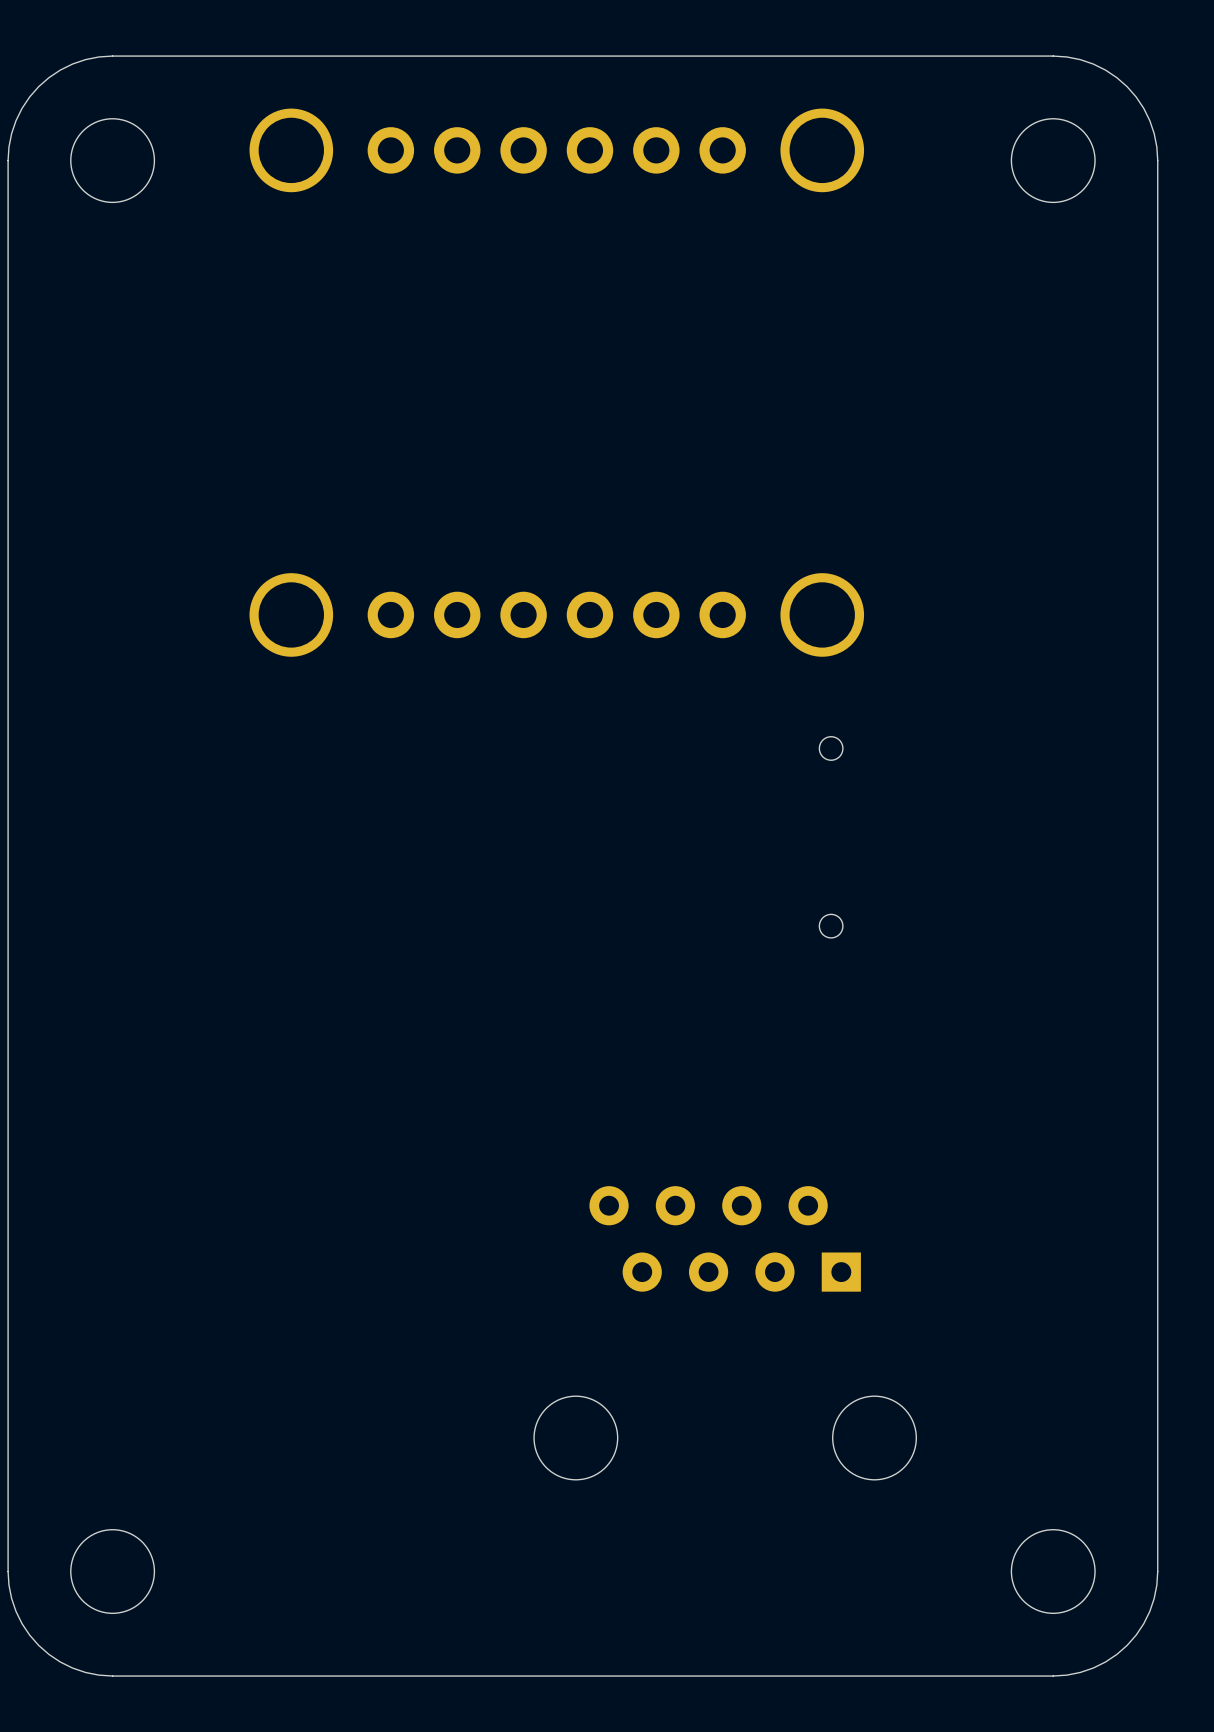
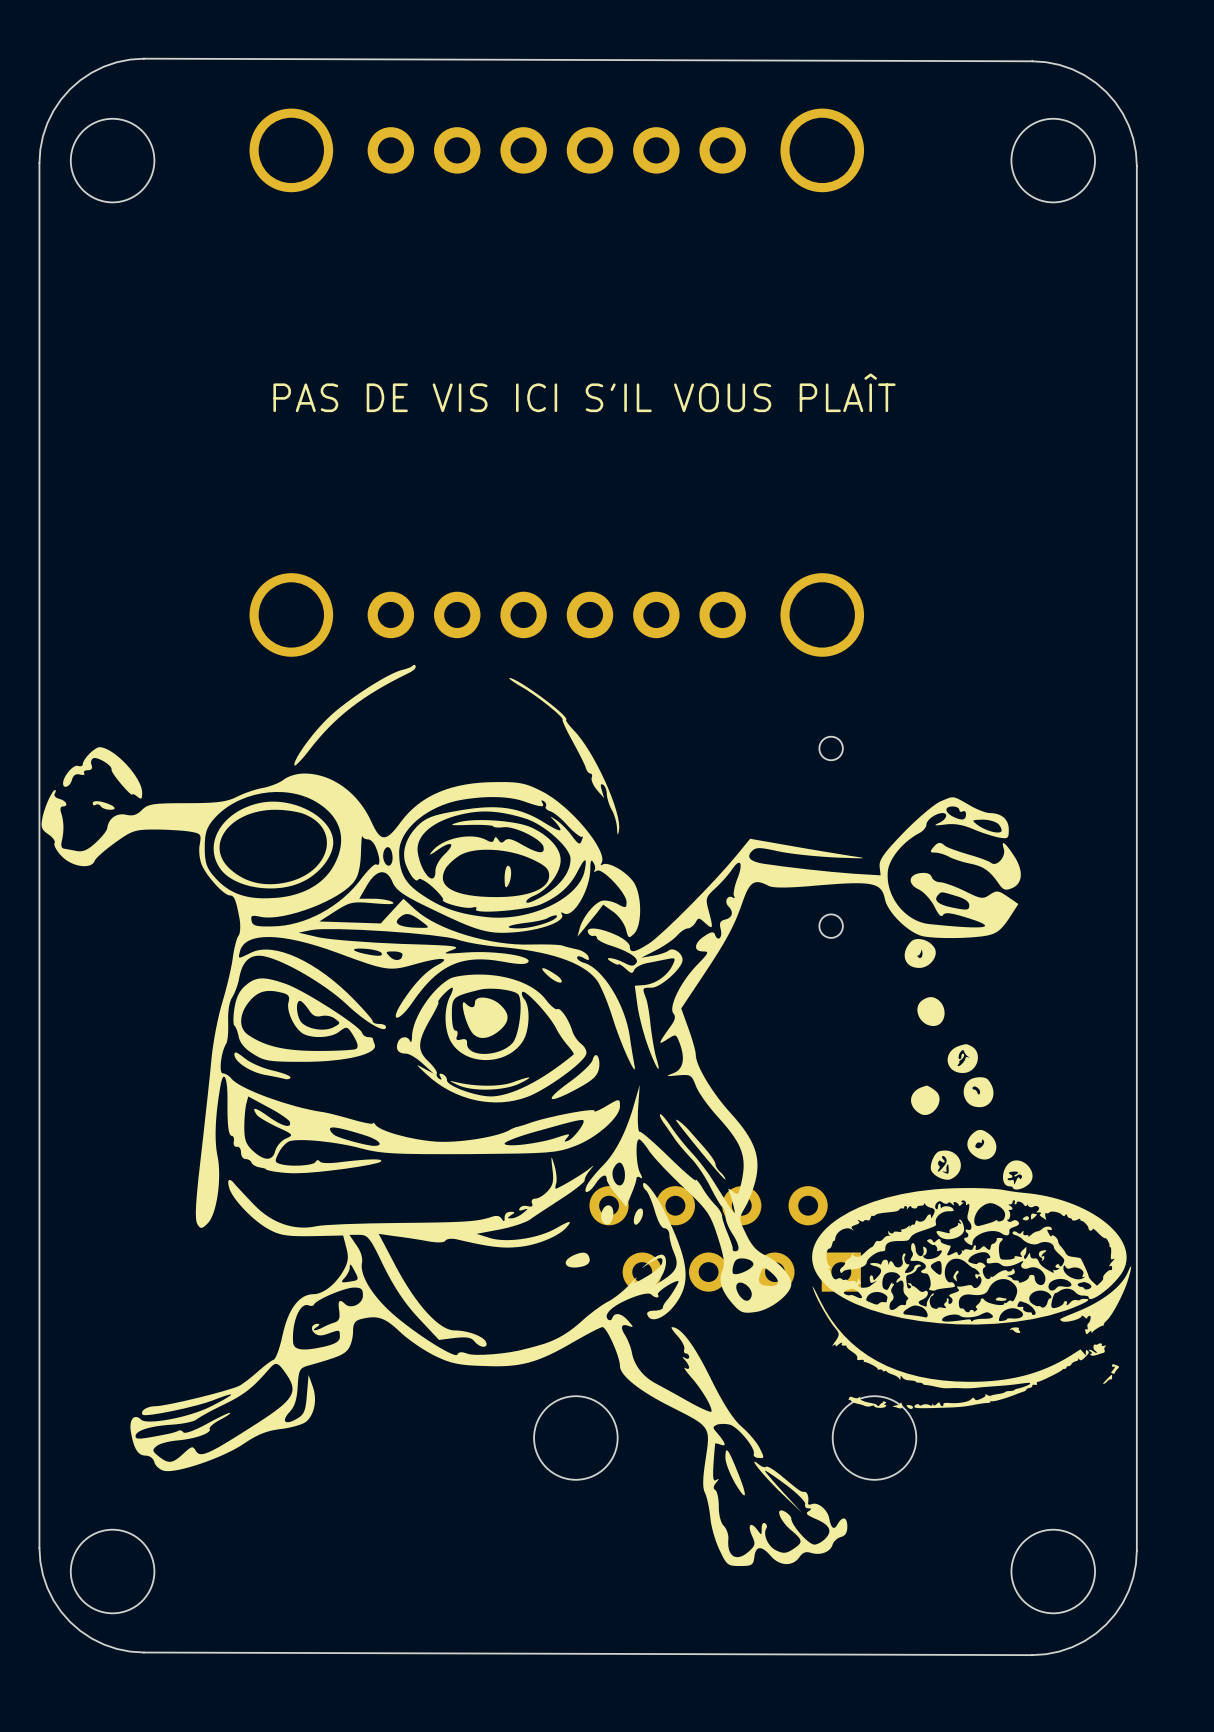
board edge: (1053, 56) (112, 56) (85, 59) (60, 70) (38, 86) (22, 108) (11, 133) (8, 160) (8, 1571) (11, 1598) (22, 1623) (38, 1645) (60, 1662) (85, 1672) (112, 1676) (1053, 1676) (1080, 1672) (1105, 1662) (1127, 1645) (1143, 1623) (1154, 1598) (1157, 1571) (1157, 160) (1156, 146) (1149, 120) (1143, 108) (1127, 86) (1105, 70) (1093, 64) (1066, 56) (1053, 56) -> (143, 58) (1032, 61) (1059, 64) (1084, 75) (1106, 91) (1122, 113) (1133, 138) (1136, 165) (1136, 1550) (1133, 1577) (1122, 1602) (1106, 1624) (1084, 1641) (1059, 1651) (1032, 1655) (143, 1652) (116, 1648) (91, 1638) (70, 1621) (53, 1600) (43, 1575) (39, 1548) (39, 163) (40, 149) (47, 123) (61, 99) (70, 89) (91, 72) (103, 66) (116, 62) (143, 58)
text: none -> PAS DE VIS ICI S'IL VOUS PLAÎT (584, 392)
drawing: none -> [41, 664, 1132, 1567]

